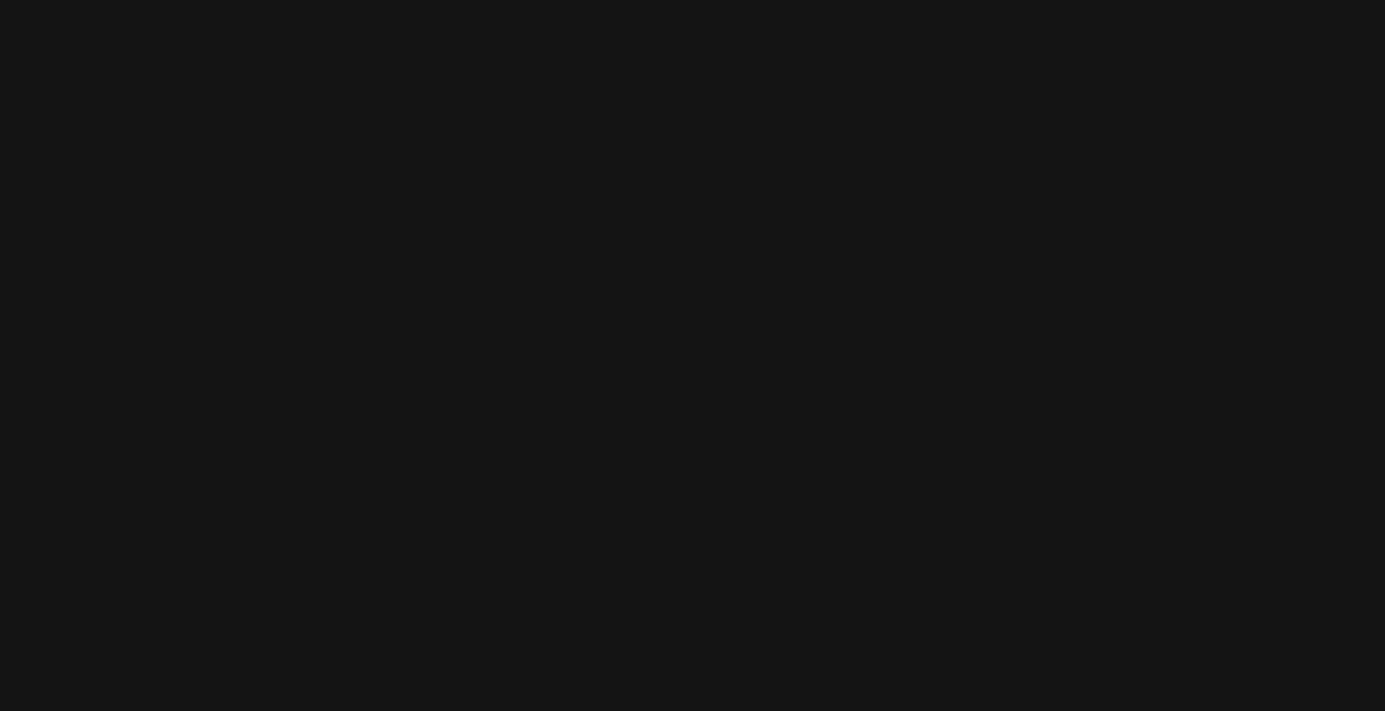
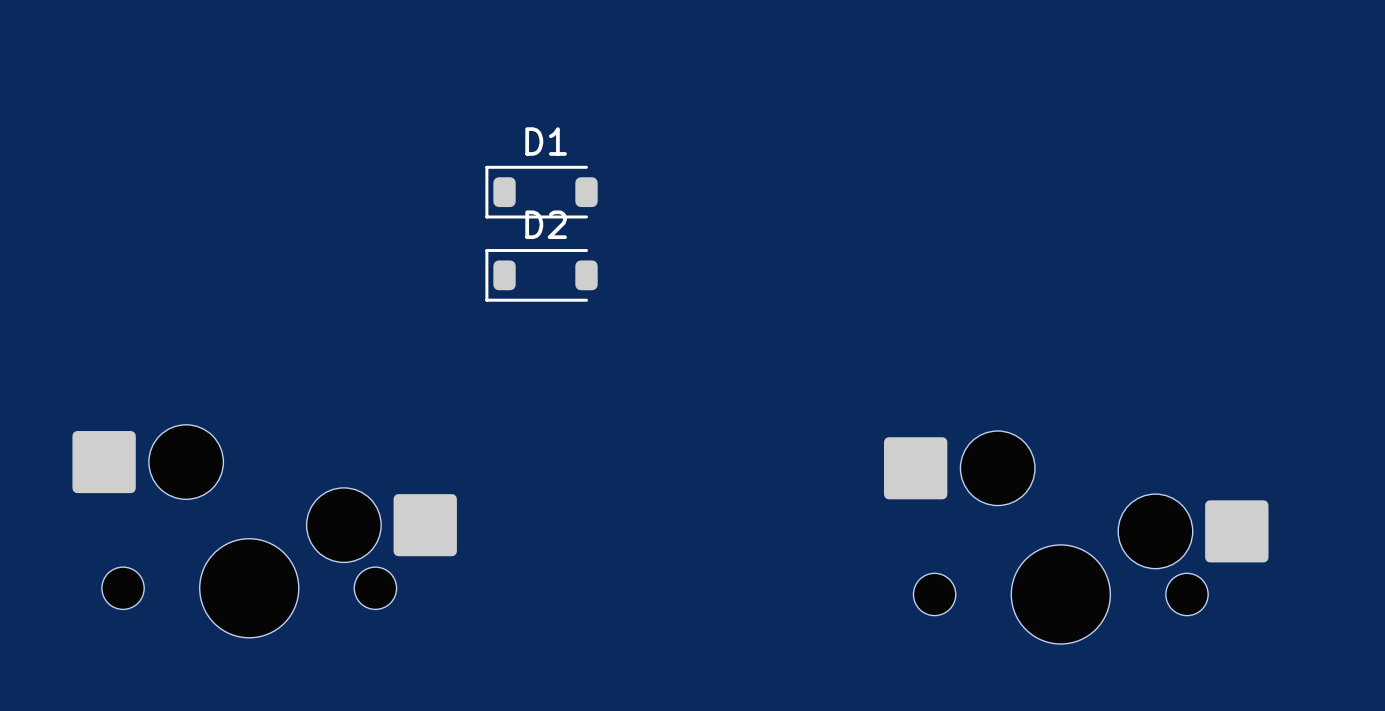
D1: none -> (541, 192)
D2: none -> (541, 275)
part: none -> (264, 531)
part: none -> (1076, 537)

